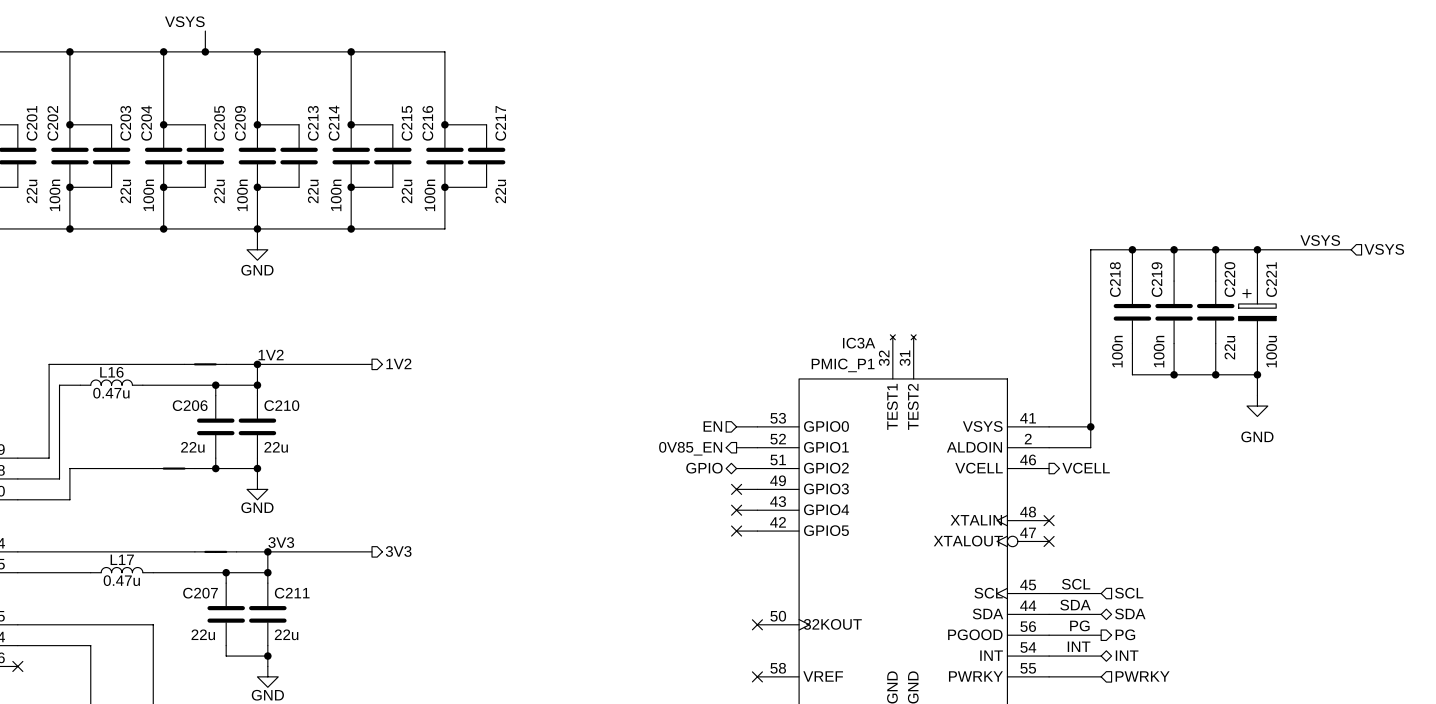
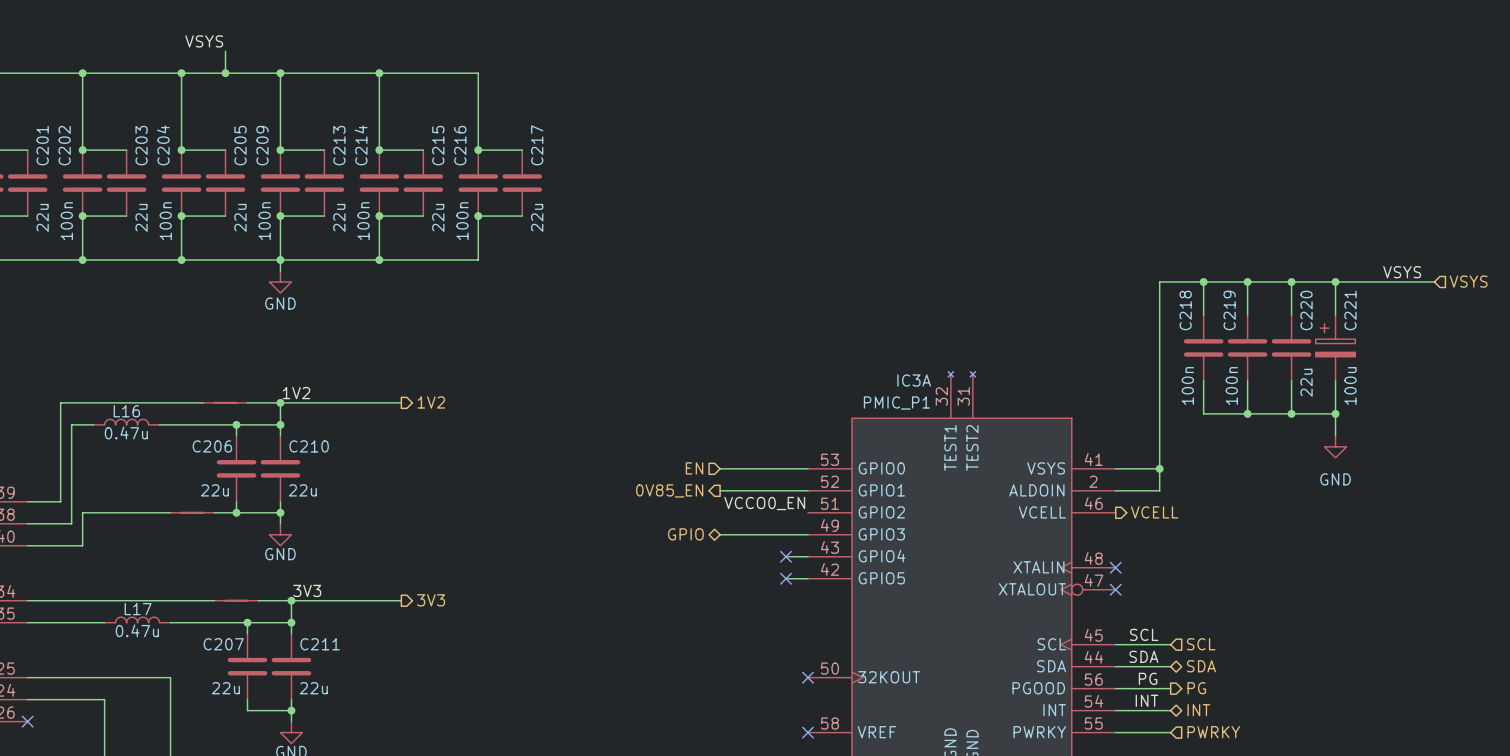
wire: none -> (720, 468) (786, 468)
hierarchical label position: EN (712, 426) -> EN (694, 468)
wire: none -> (720, 490) (786, 490)
hierarchical label position: 0V85_EN (690, 448) -> 0V85_EN (669, 490)
label: none -> VCCO0_EN (764, 503)
hierarchical label position: GPIO (704, 468) -> GPIO (685, 534)
wire: (736, 468) (757, 468) -> none
wire: none -> (720, 534) (786, 534)
no-connect mark: (736, 489) -> none

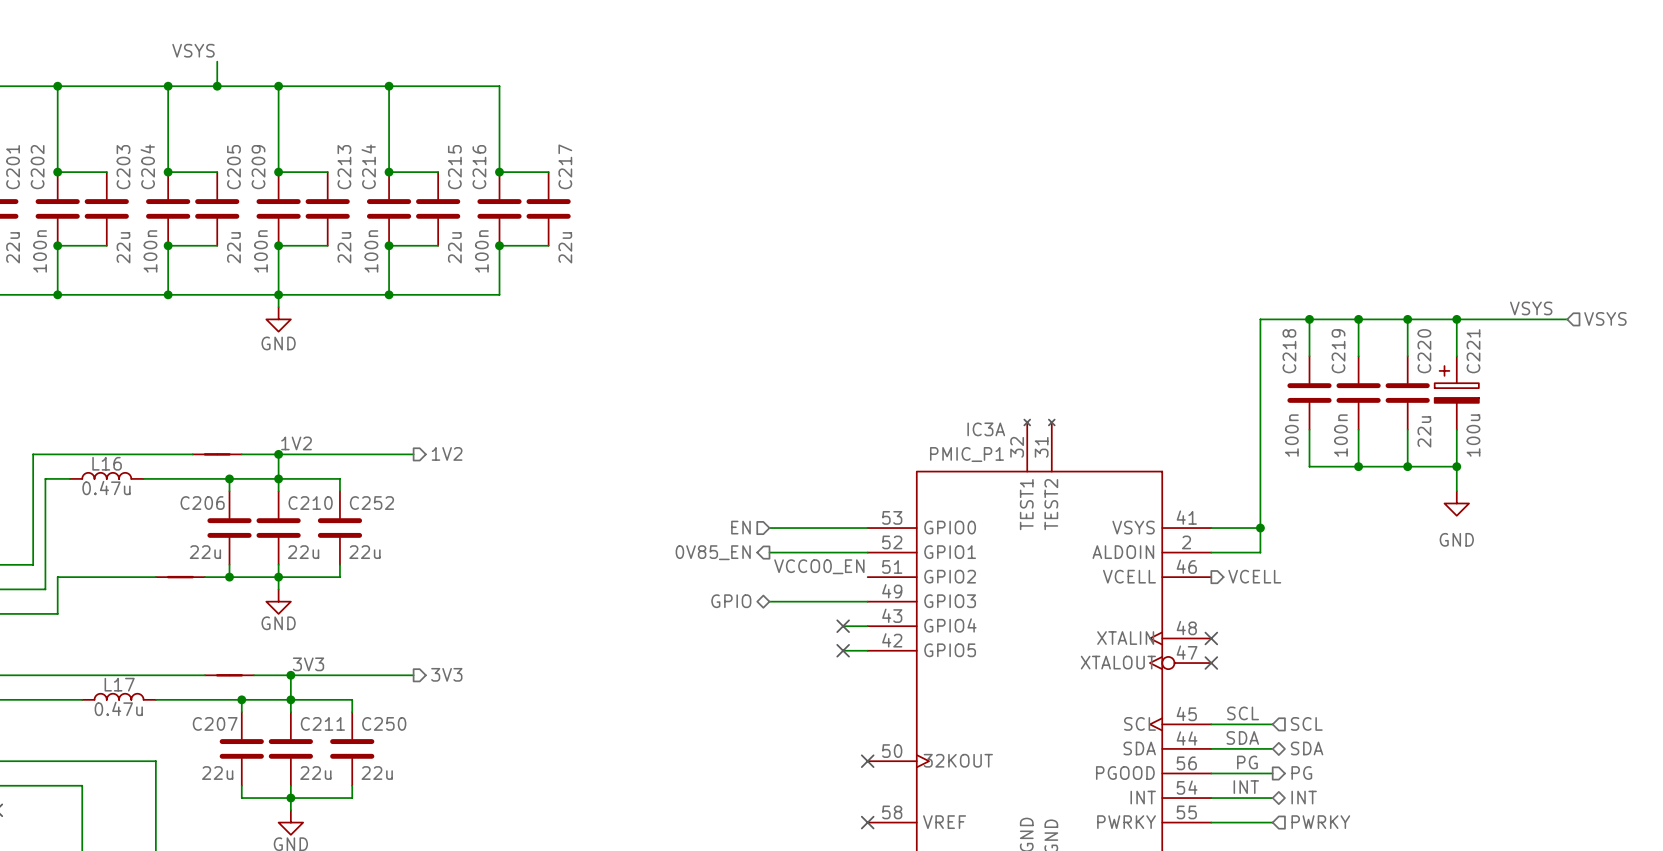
wire: none -> (278, 478) (339, 478) (339, 491)
C252: none -> 22u (339, 528)
wire: none -> (339, 564) (339, 577) (278, 577)
wire: none -> (290, 699) (352, 699) (352, 712)
C250: none -> 22u (352, 748)
wire: none -> (352, 785) (352, 798) (290, 798)

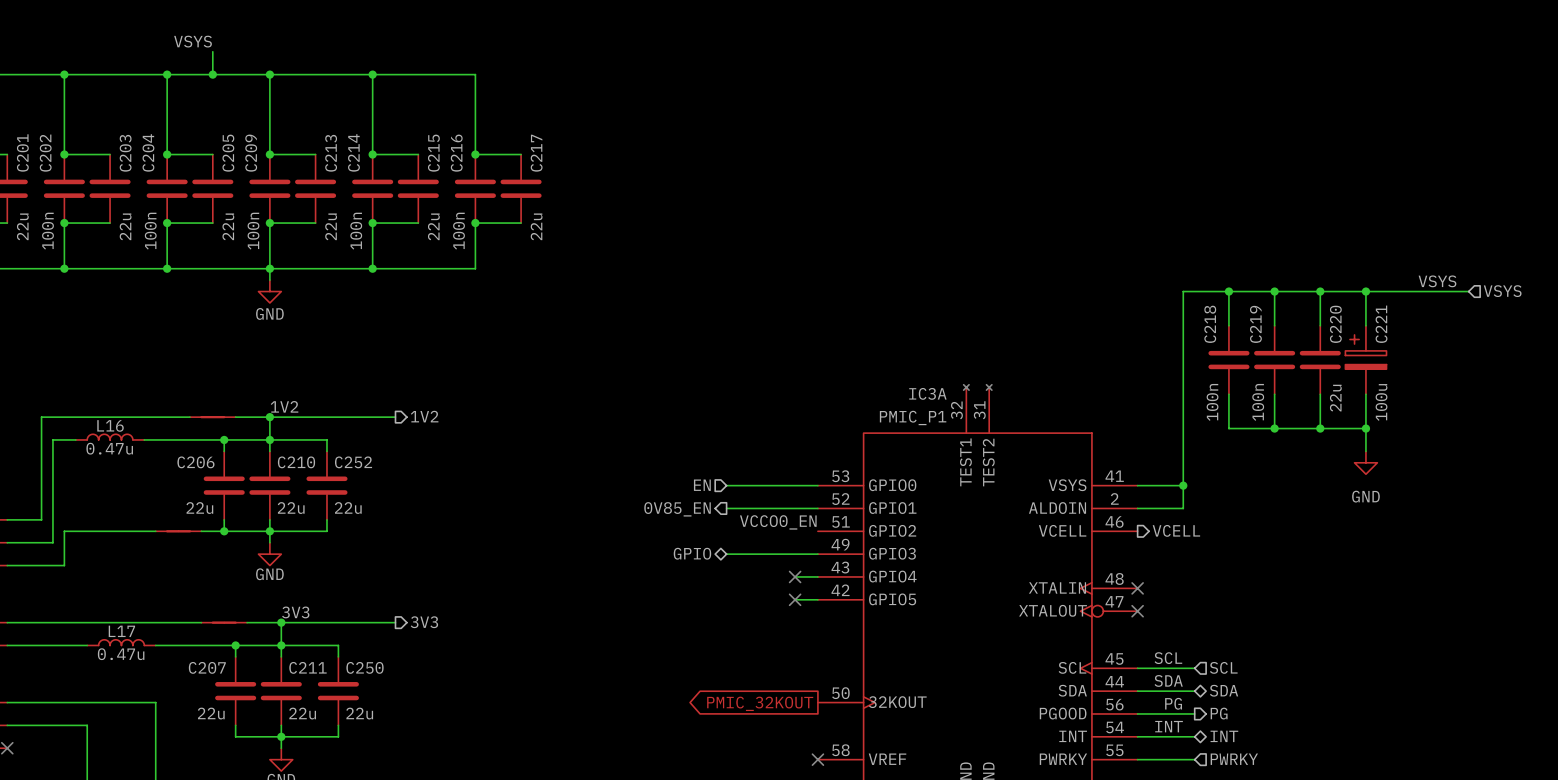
global label: none -> PMIC_32KOUT (760, 703)
no-connect mark: (867, 761) -> none

